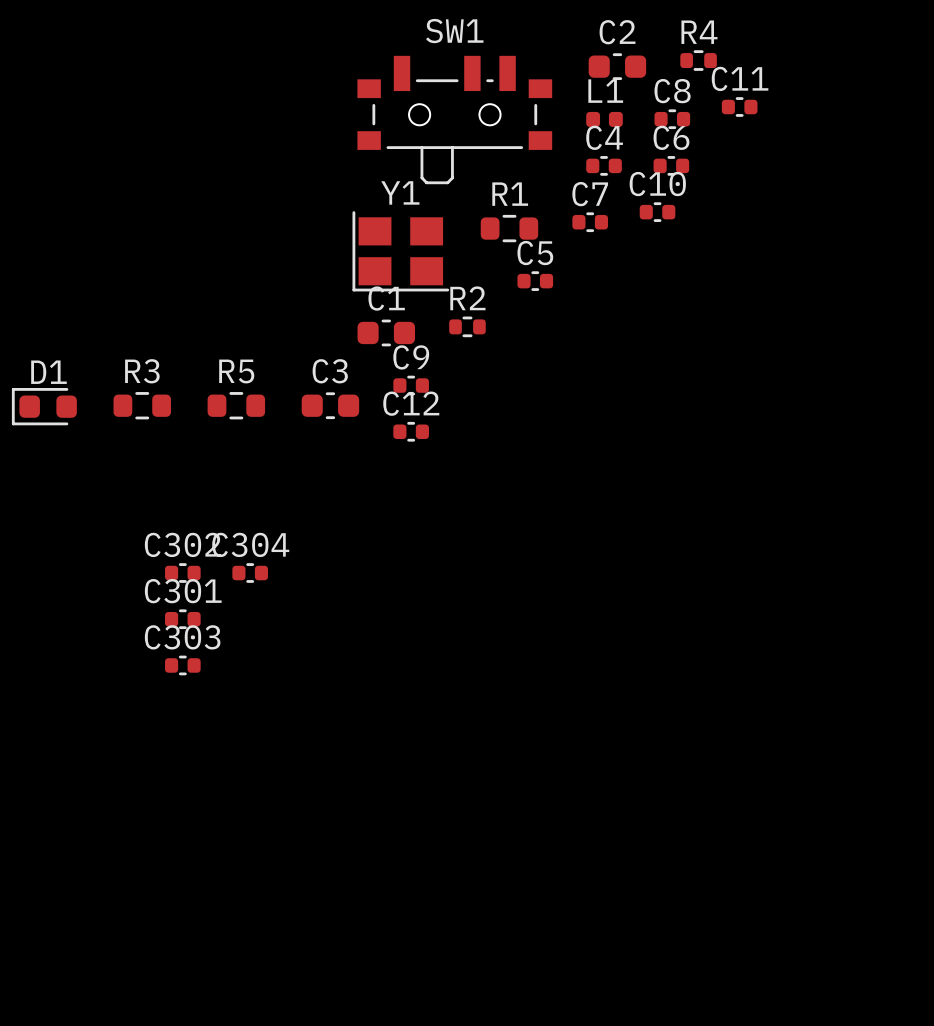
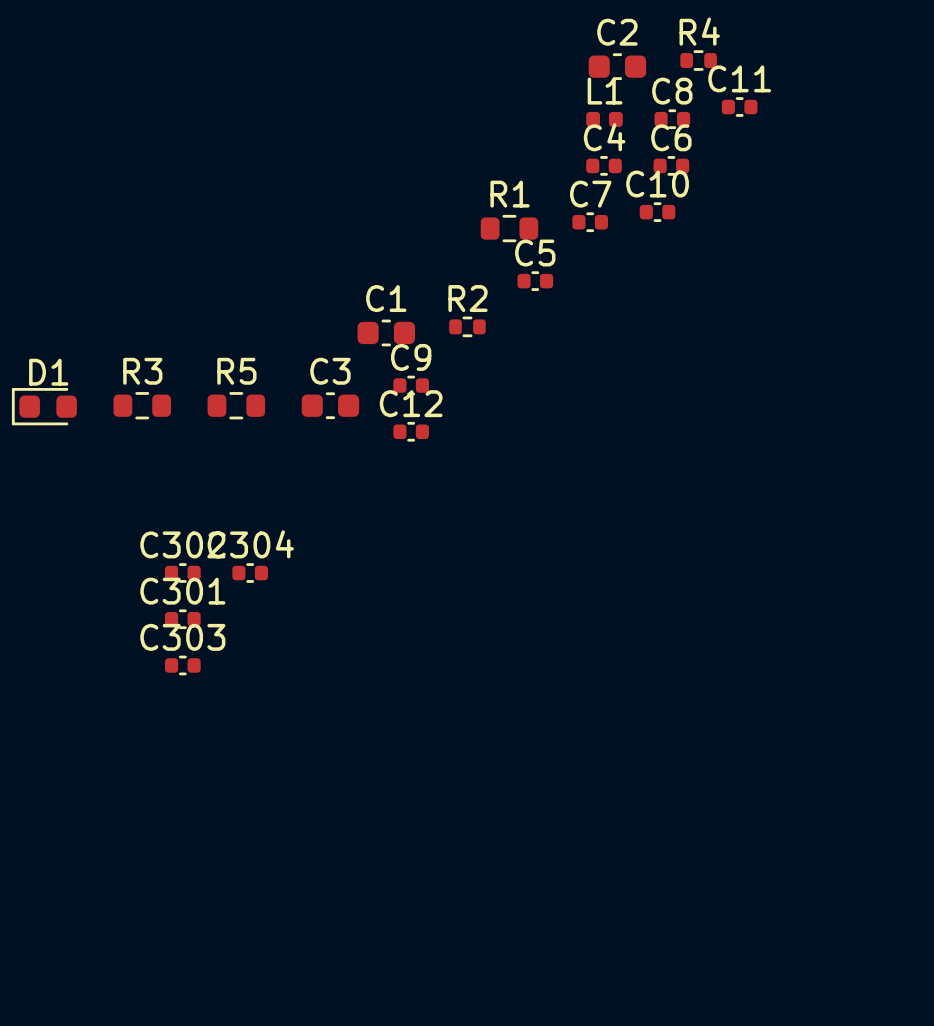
SW1: (454, 120) -> none
Y1: (400, 251) -> none

